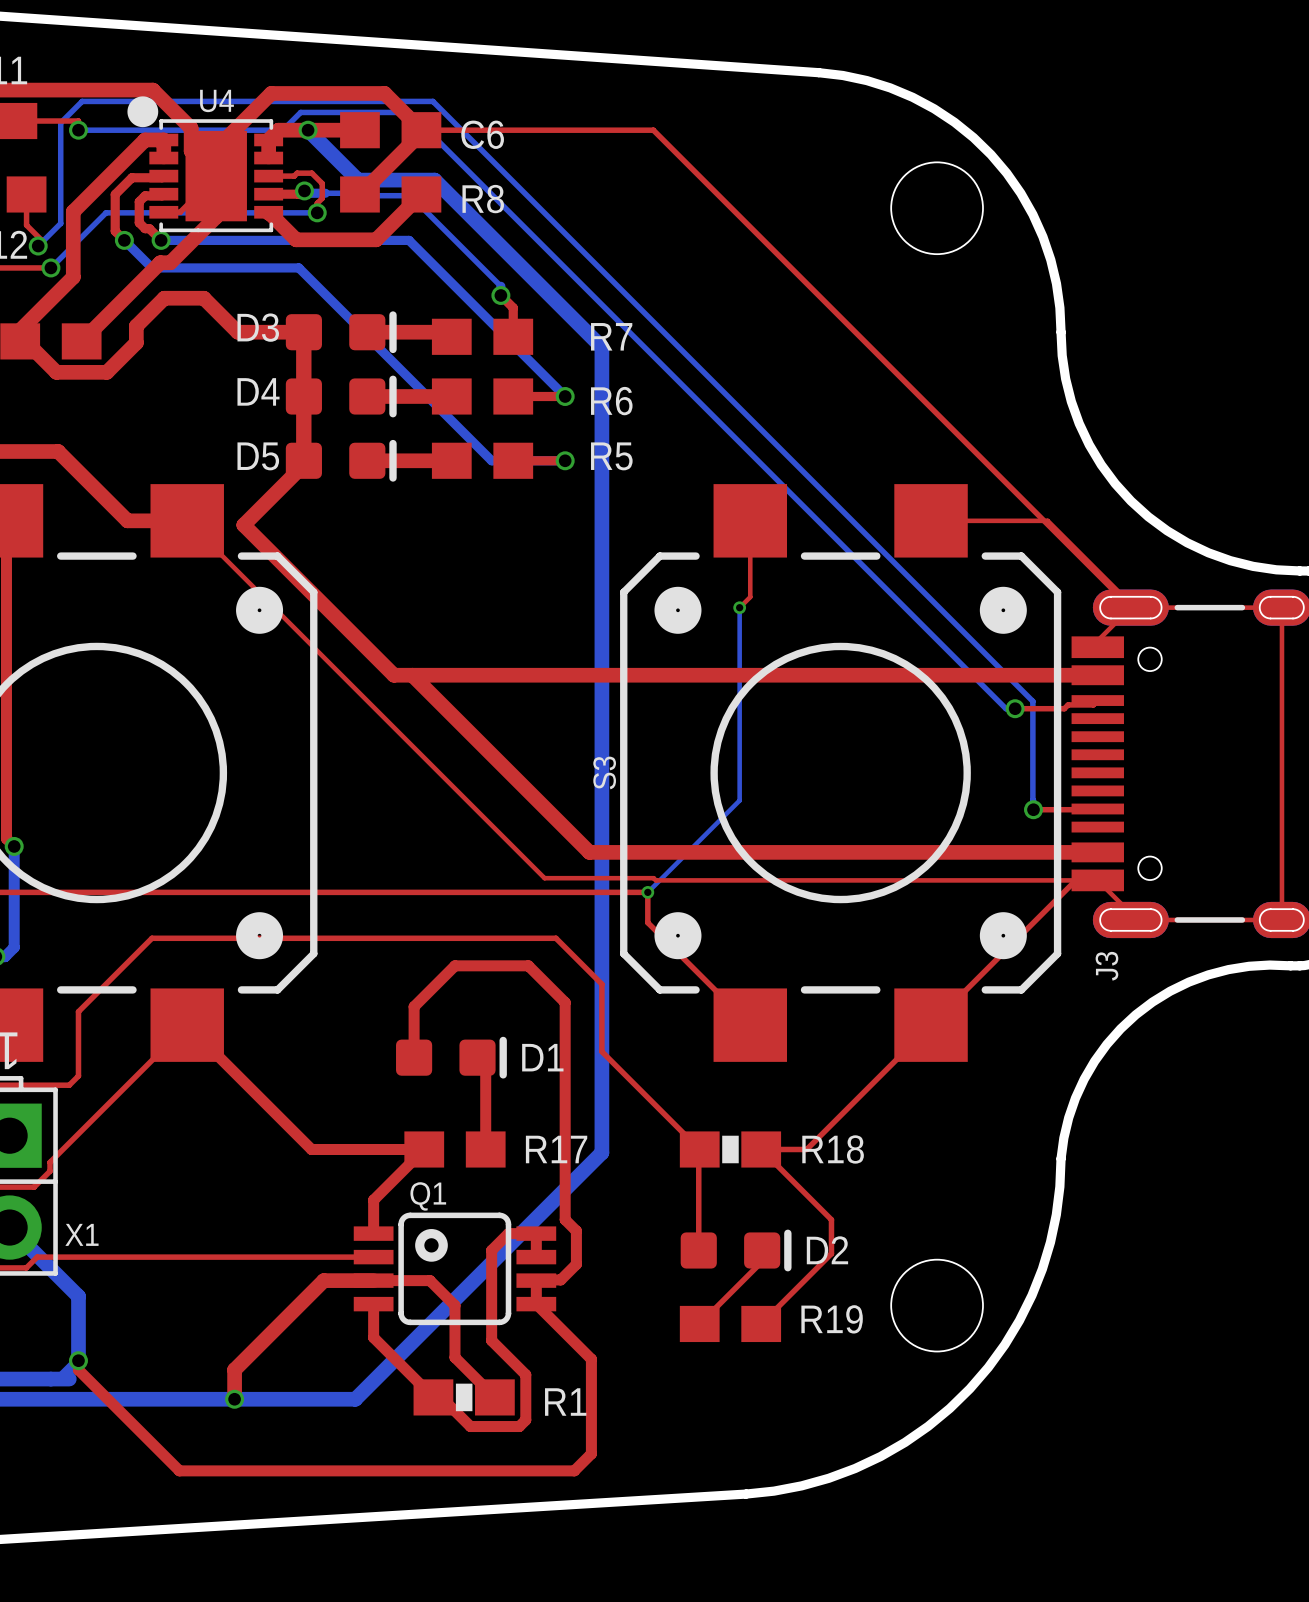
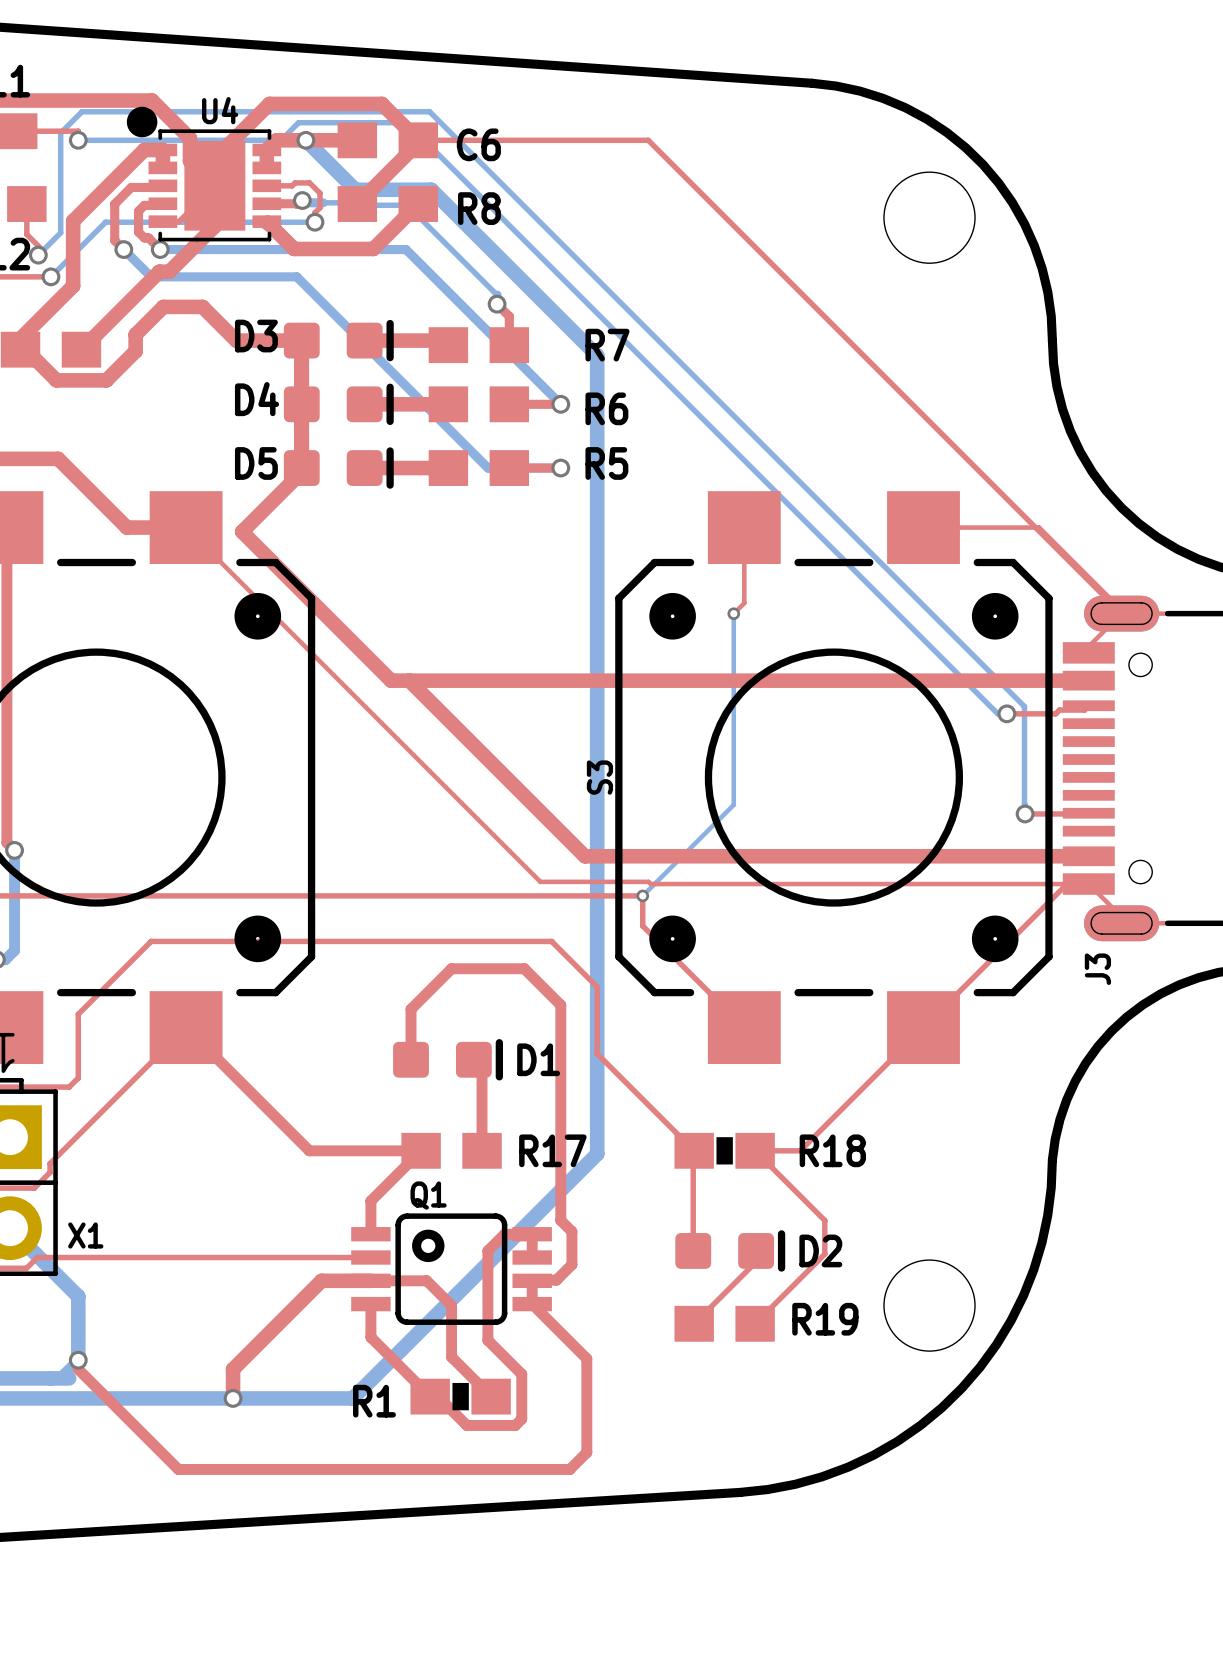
R1 name position: R1 (565, 1402) -> R1 (374, 1401)

